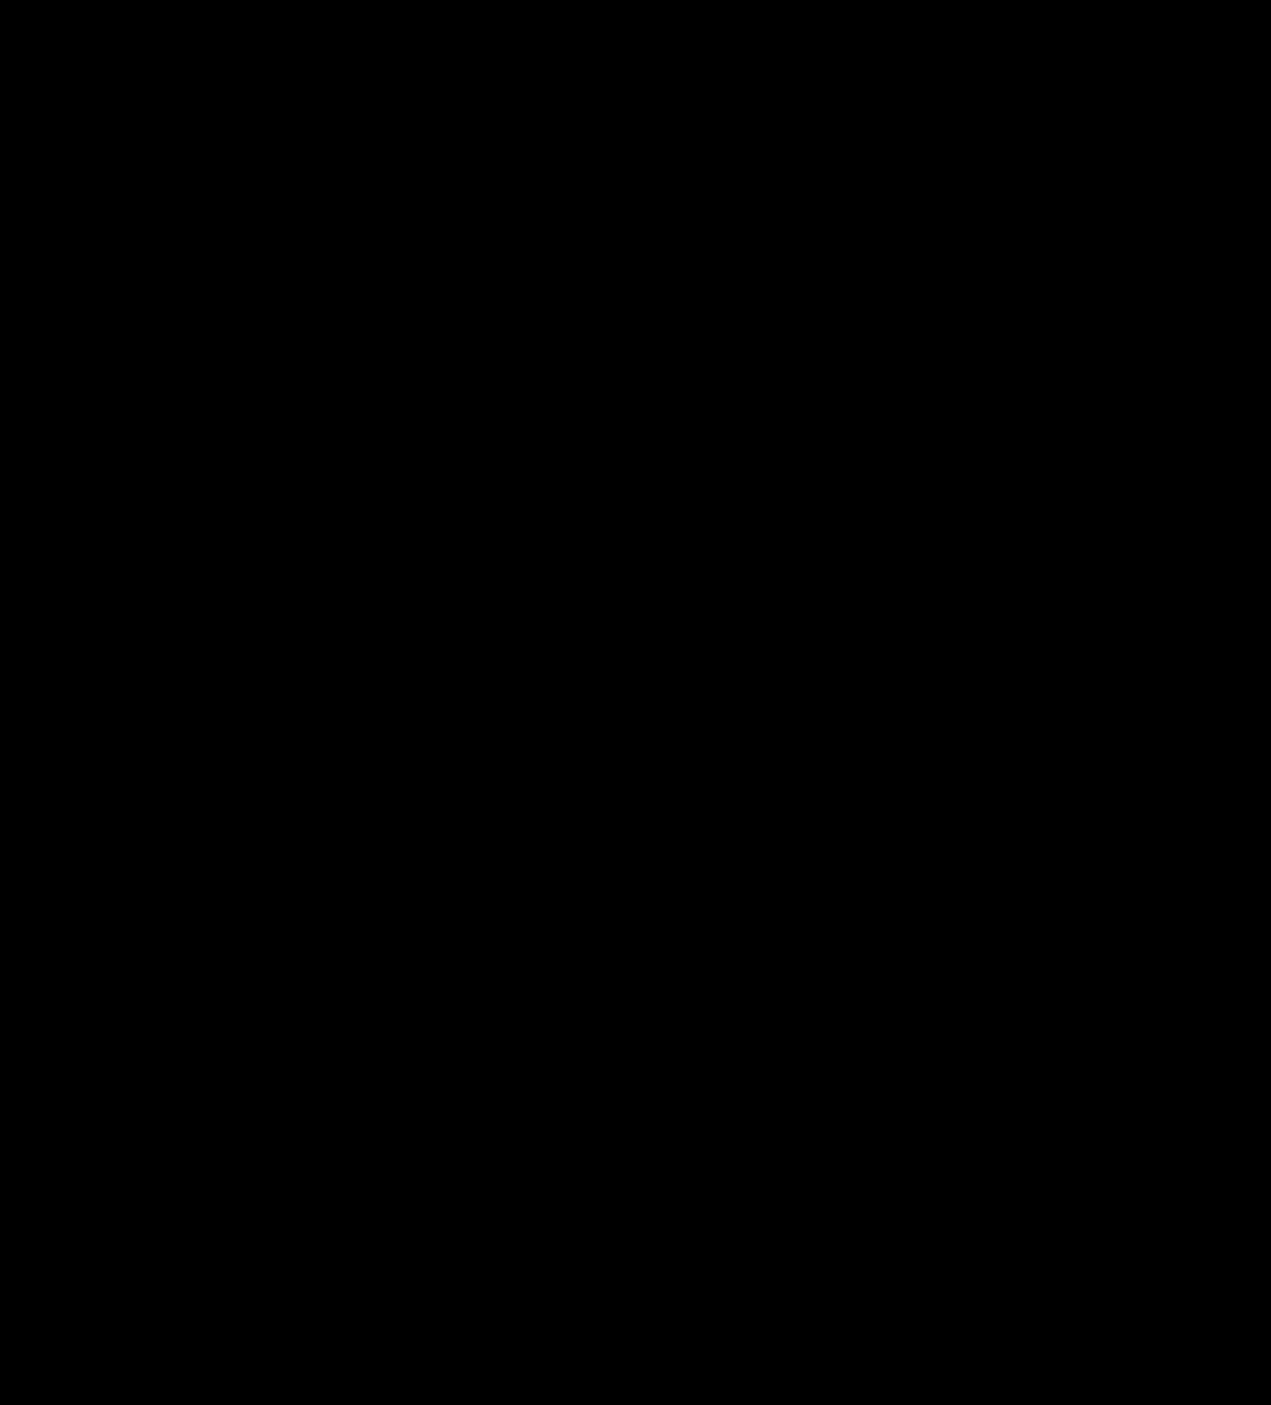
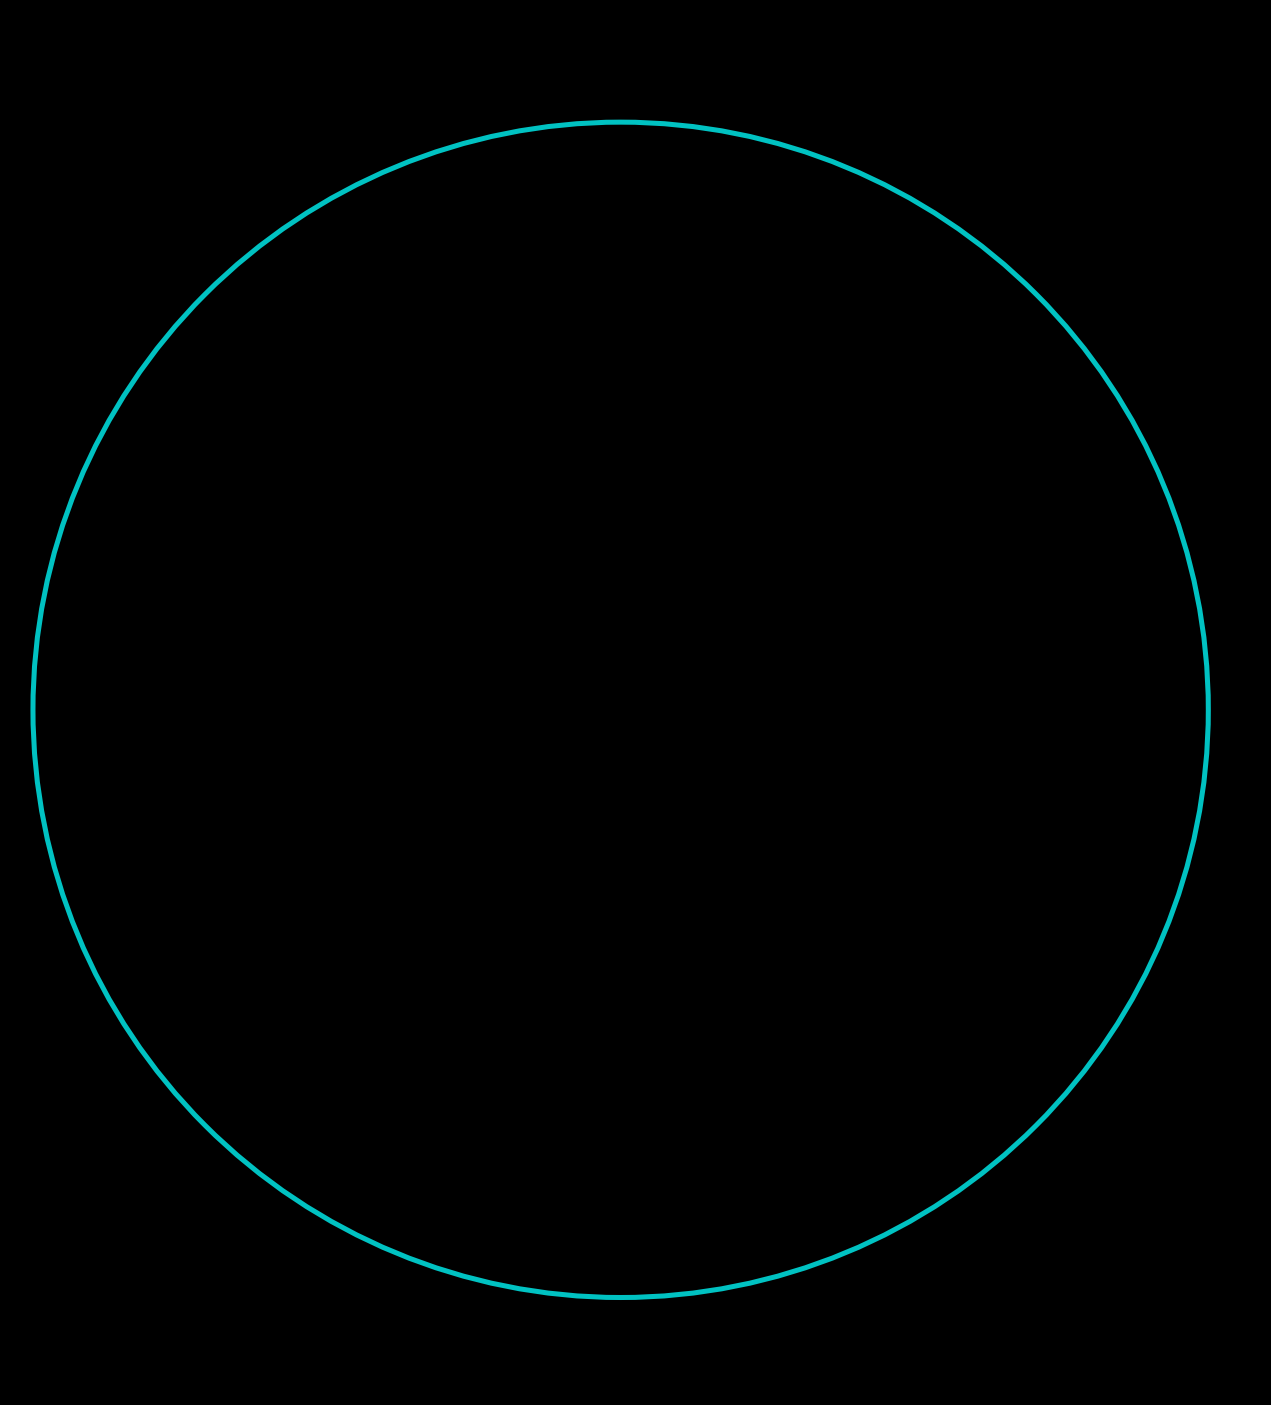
drawing: none -> [30, 119, 1211, 1301]

